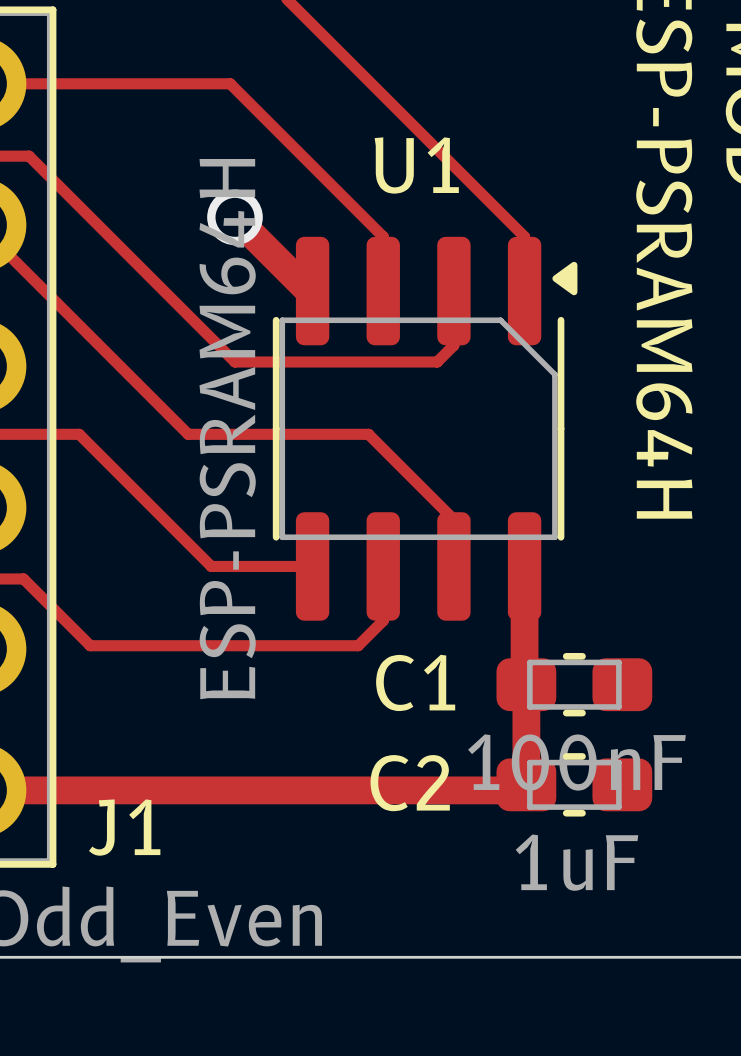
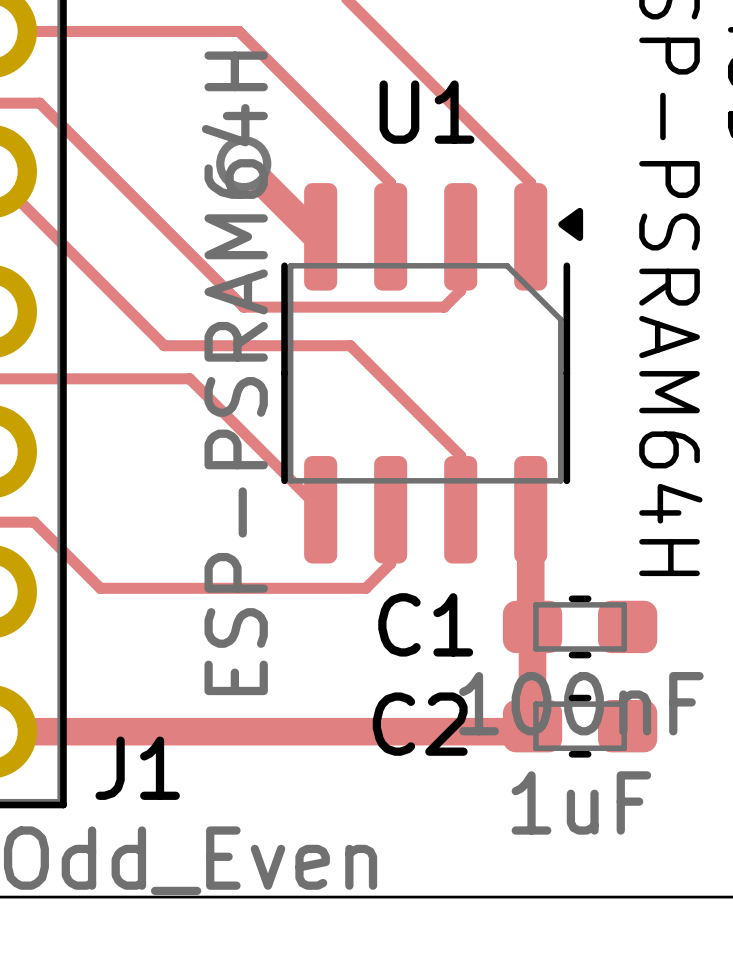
top track: (154, 400) (188, 434) (368, 434) (453, 519) -> (164, 345) (350, 345) (460, 456) (460, 463)
top track: (79, 434) (211, 566) (312, 566) -> (89, 378) (189, 378) (320, 509)

